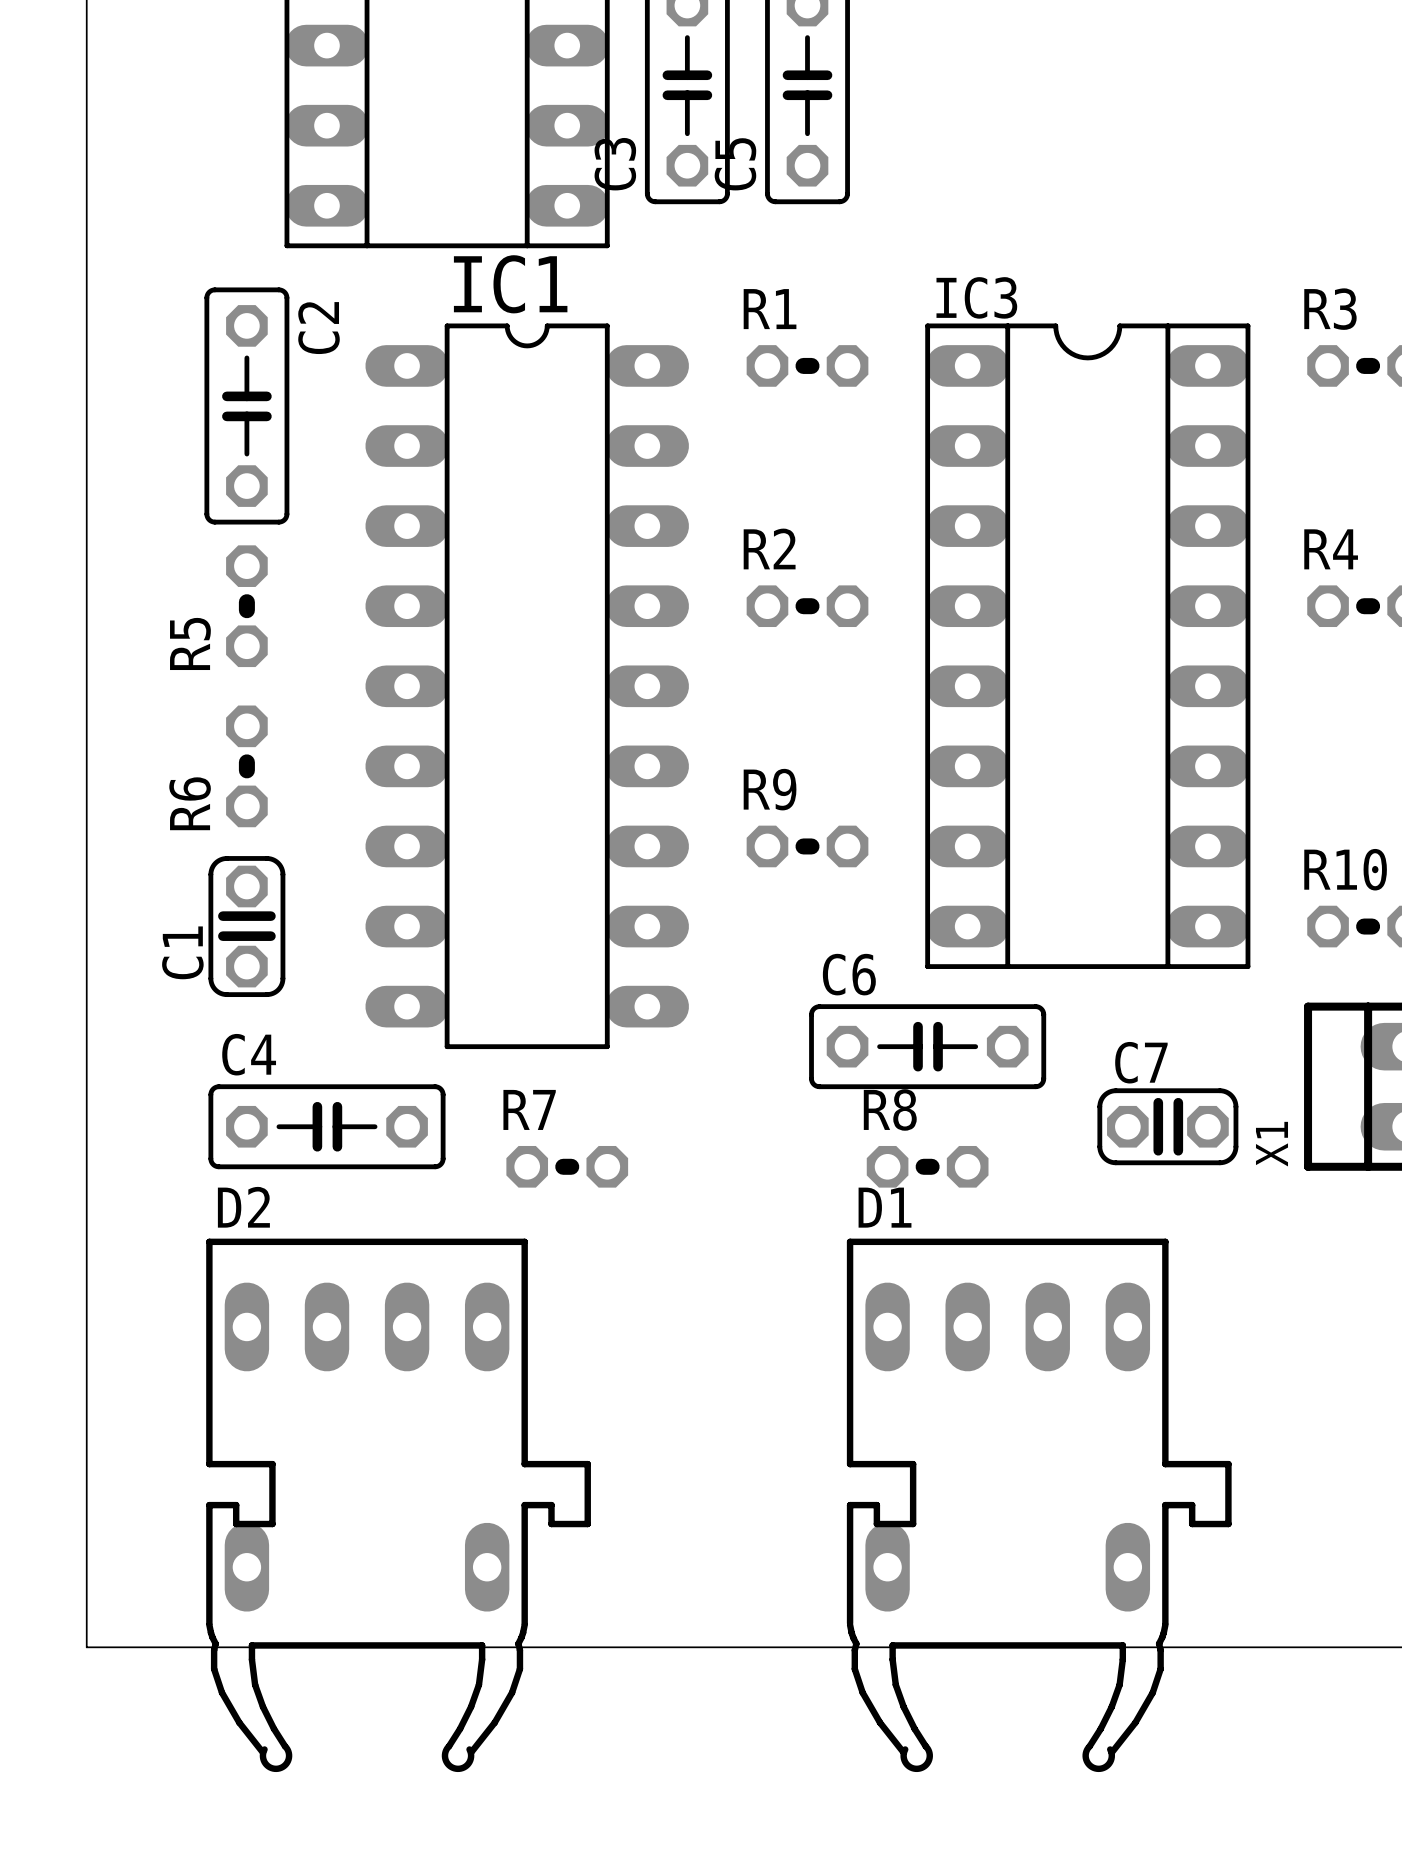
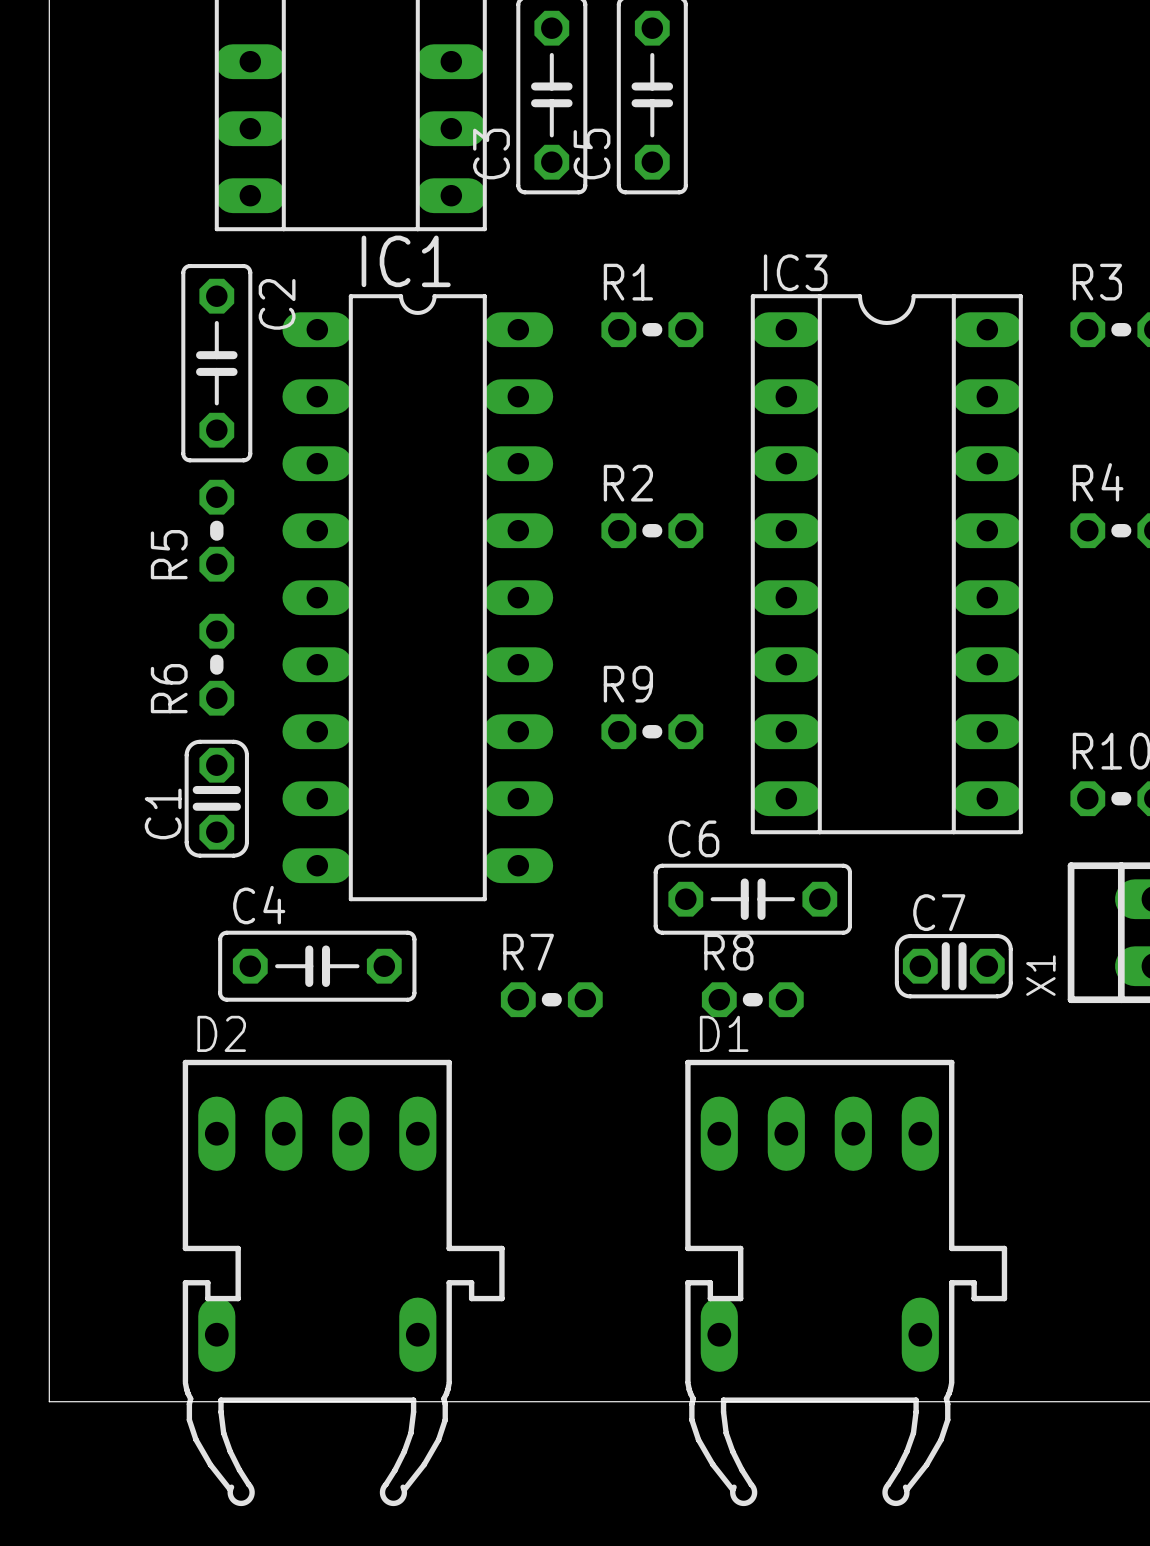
C2 position: (246, 405) -> (216, 363)
R5 position: (246, 606) -> (216, 530)
R6 position: (246, 766) -> (216, 664)
C1 position: (246, 926) -> (216, 798)
C4 position: (326, 1126) -> (317, 966)
R7 position: (567, 1166) -> (551, 999)
D2 position: (398, 1505) -> (343, 1282)

